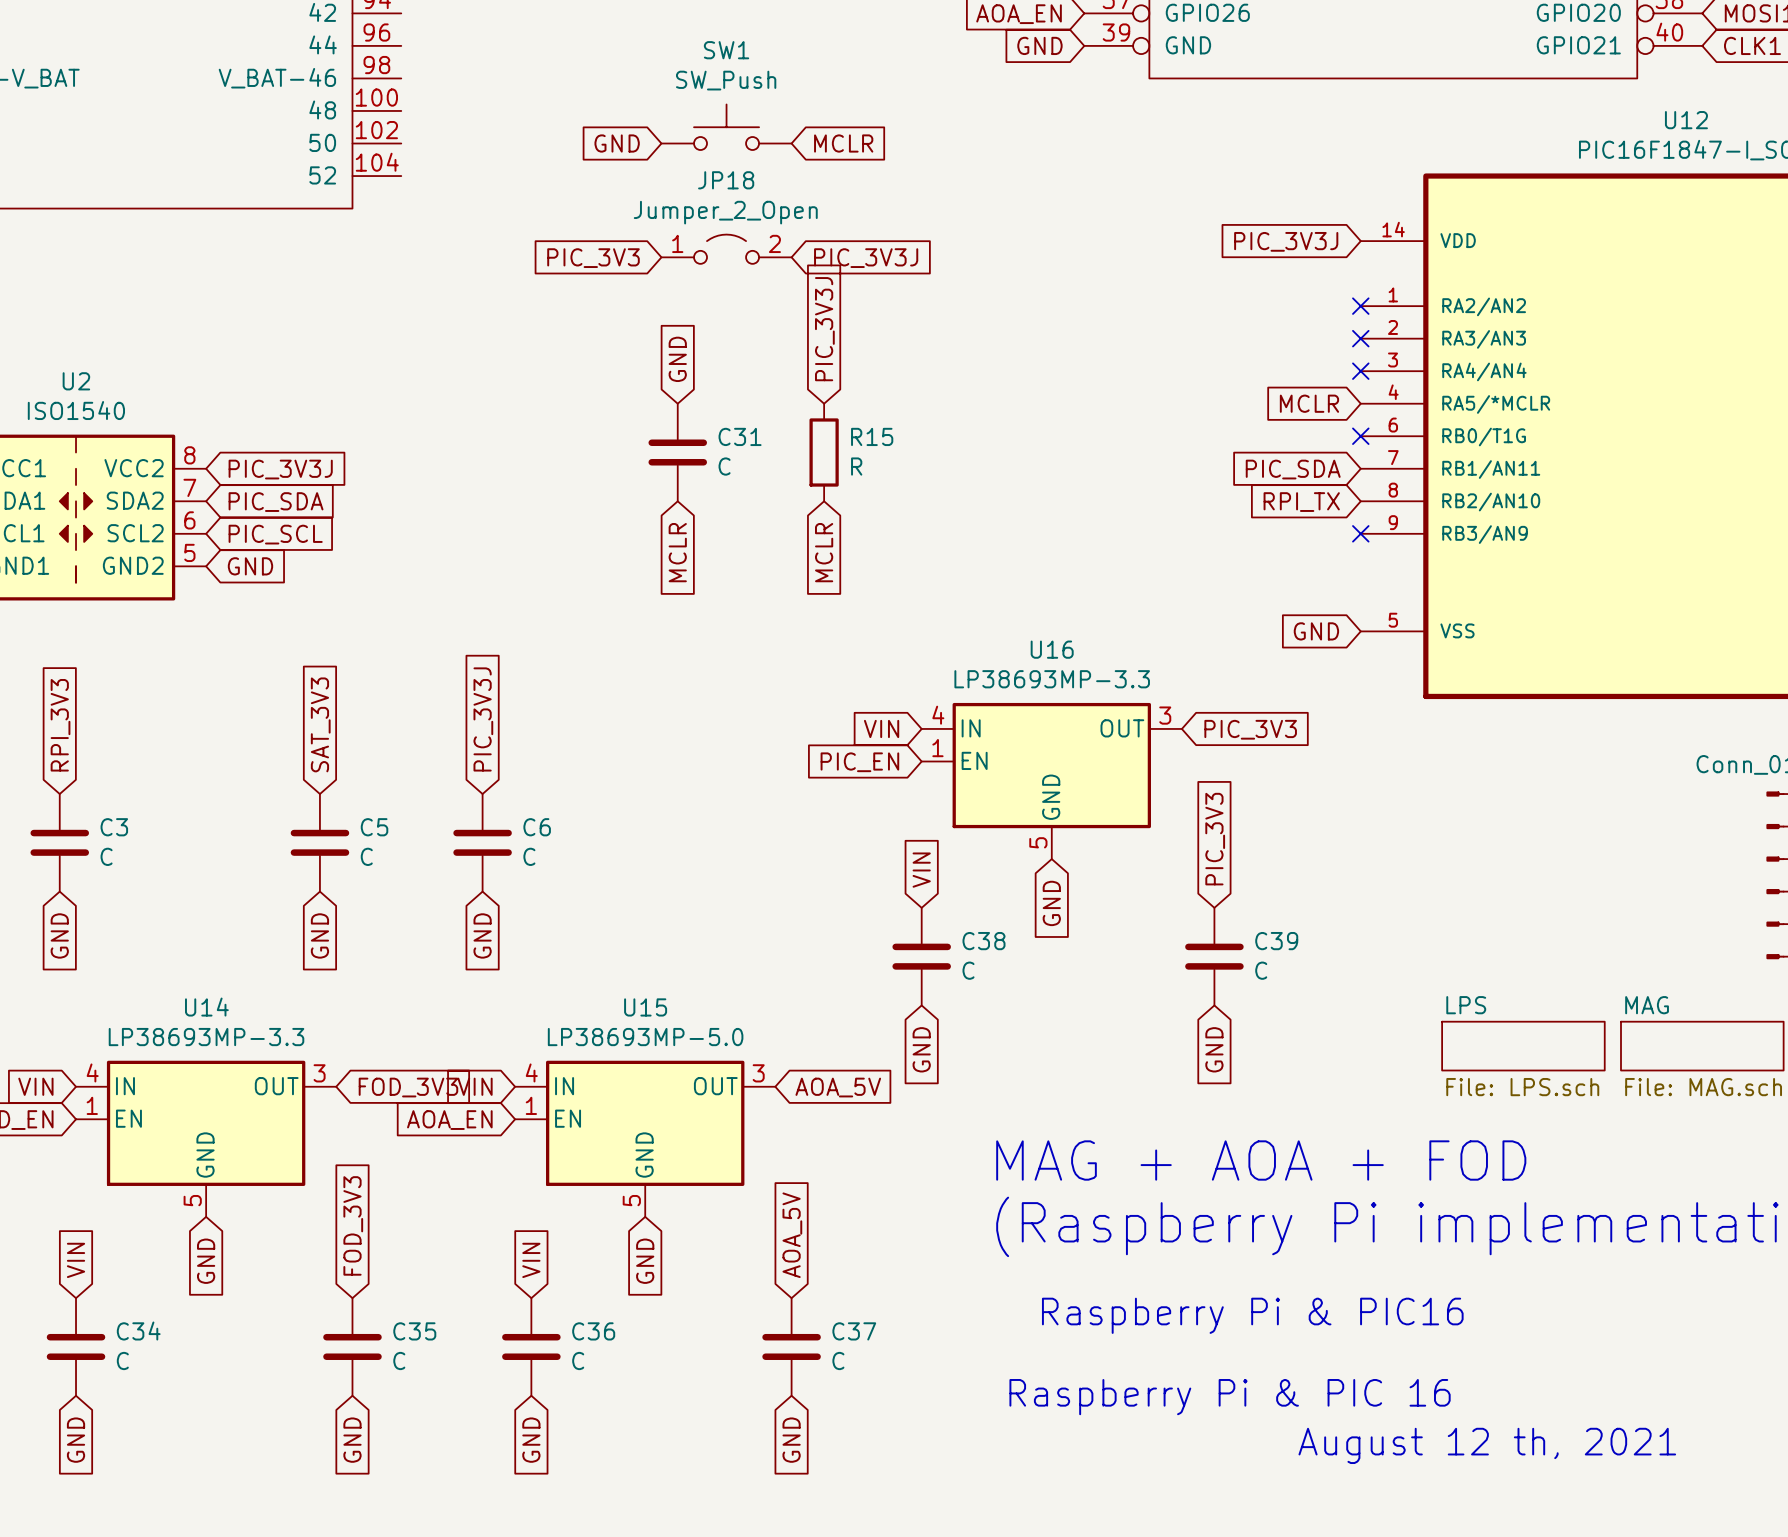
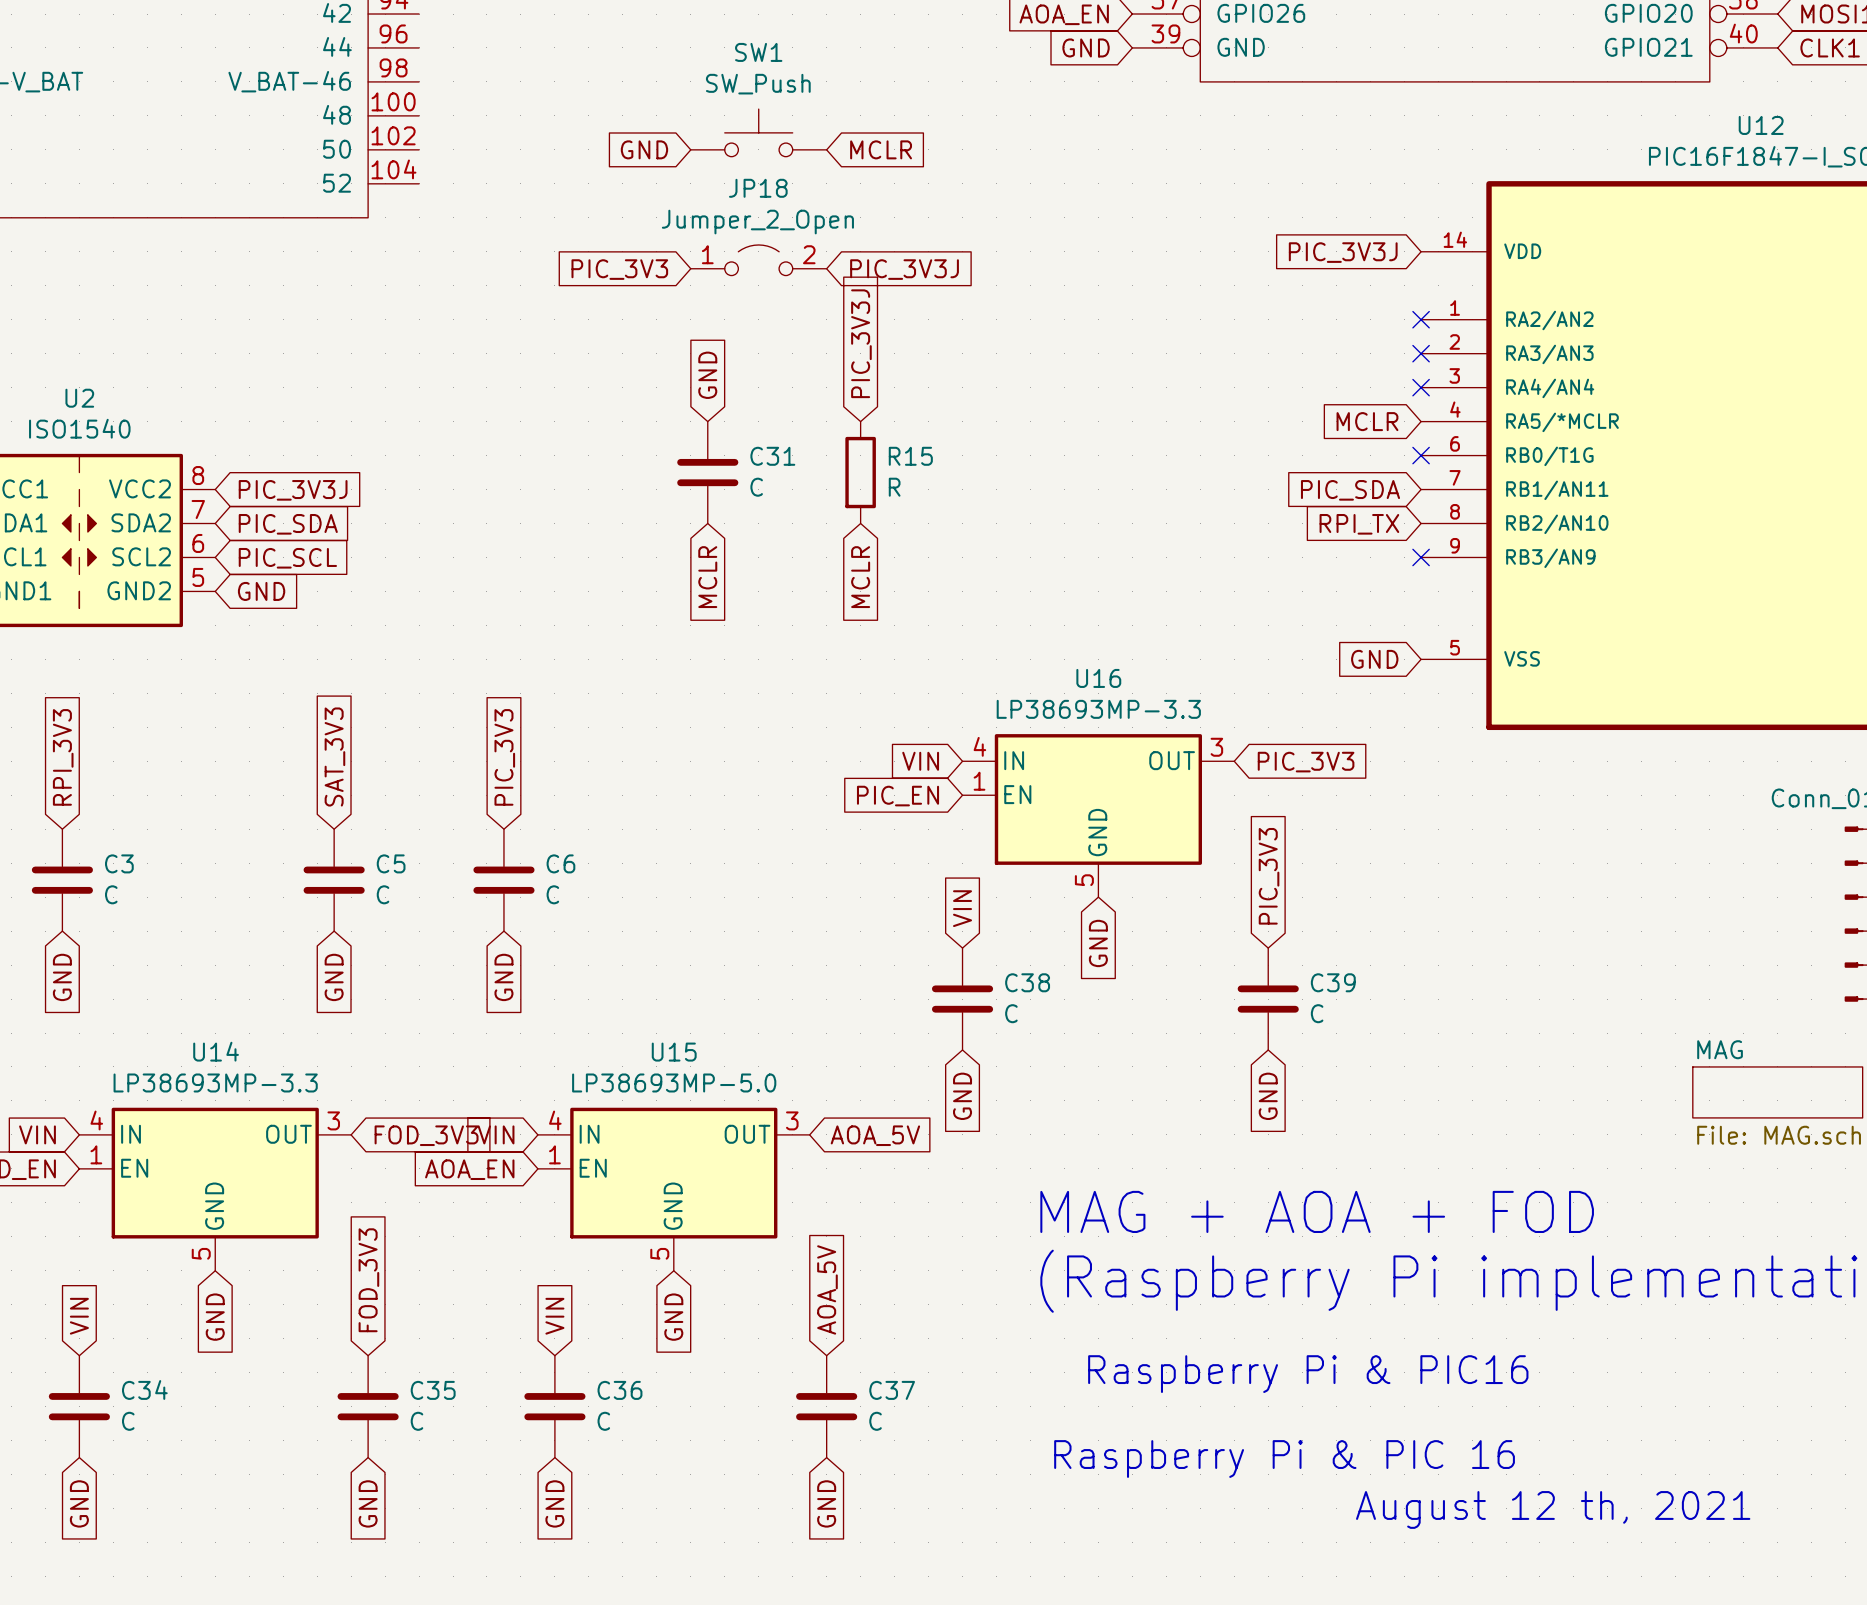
global label: PIC_3V3J (483, 719) -> PIC_3V3 (504, 757)
sheet LPS: File: LPS.sch (1523, 1046) -> none

